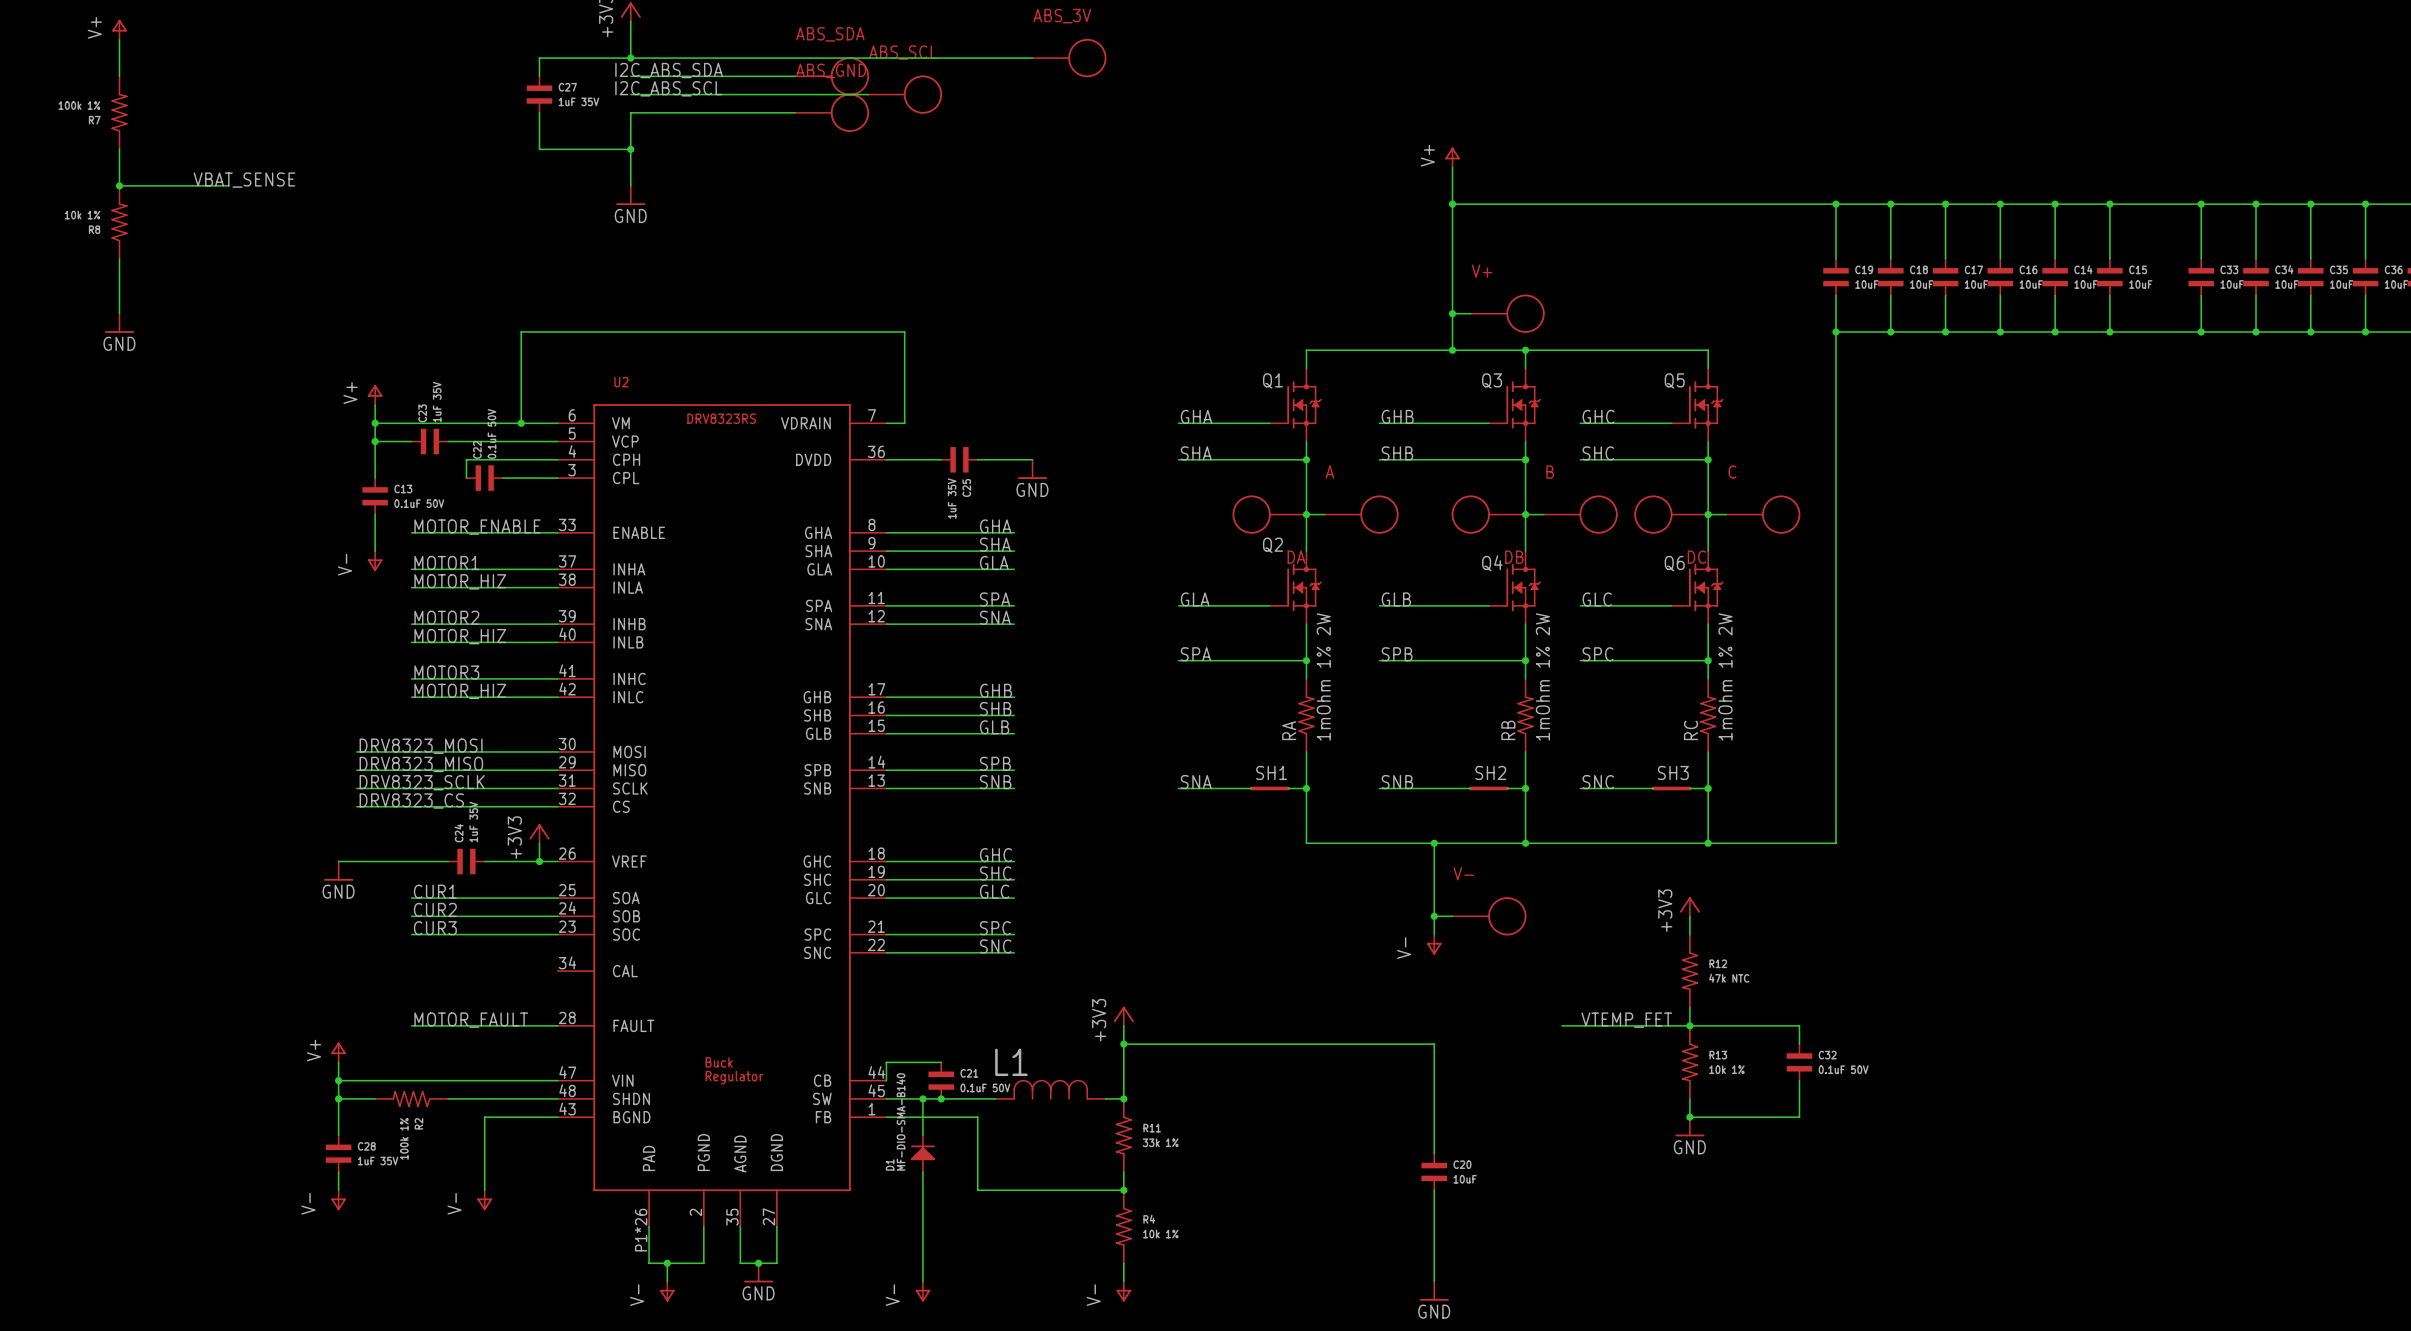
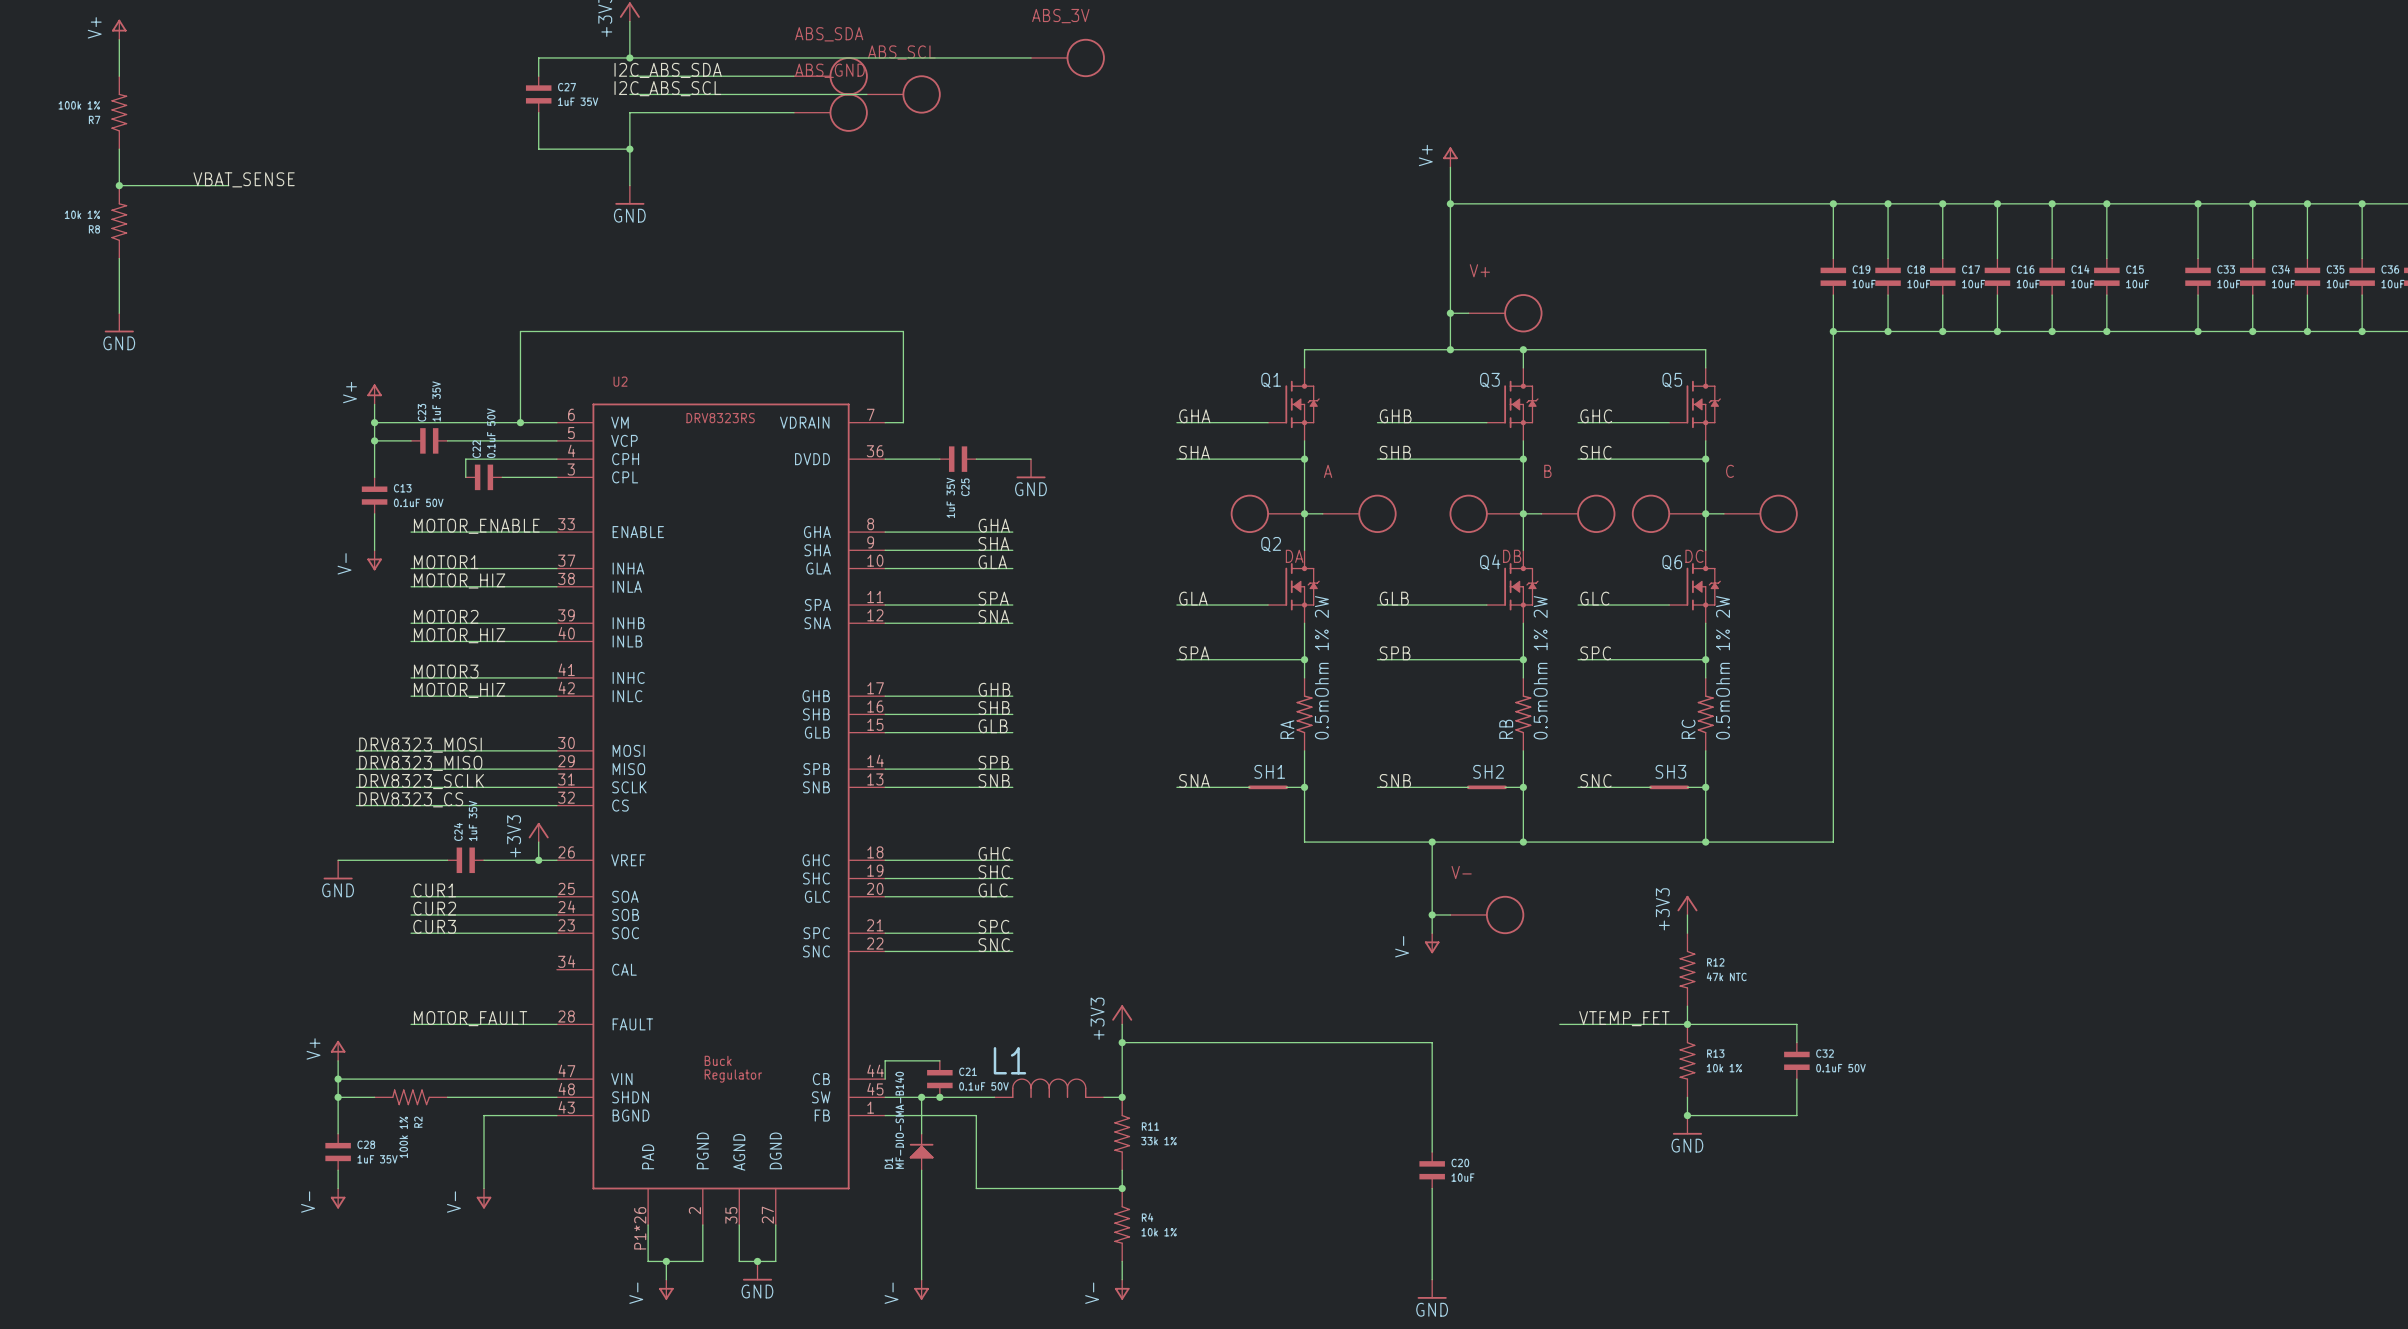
RA value: 1mOhm 1% 2W (1323, 676) -> 0.5mOhm 1% 2W (1321, 667)
RB value: 1mOhm 1% 2W (1542, 676) -> 0.5mOhm 1% 2W (1540, 667)
RC value: 1mOhm 1% 2W (1725, 676) -> 0.5mOhm 1% 2W (1723, 667)

